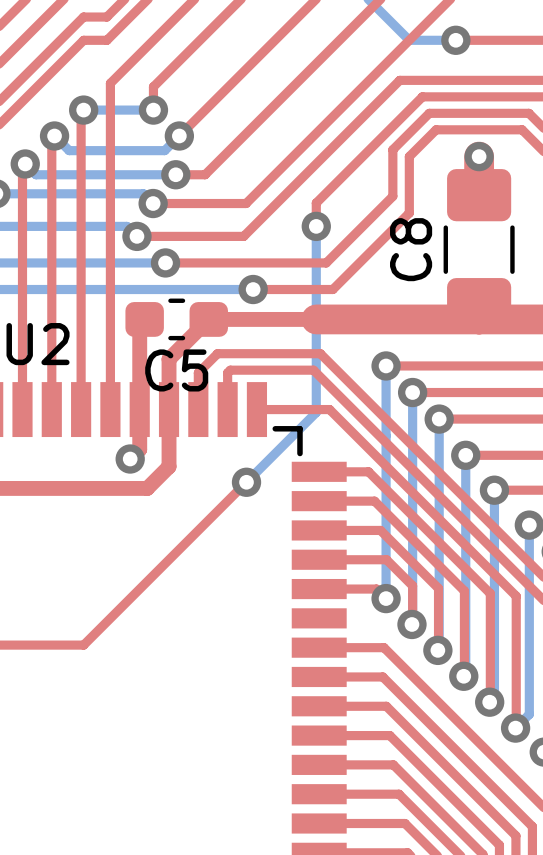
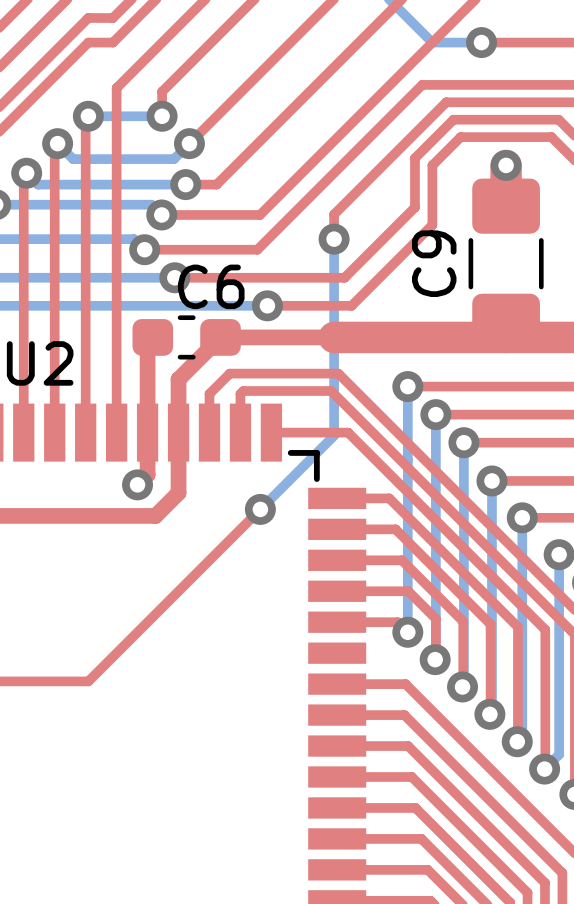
C8 name: C8 (411, 249) -> C9 (434, 263)
C5 name: C5 (176, 370) -> C6 (211, 286)

